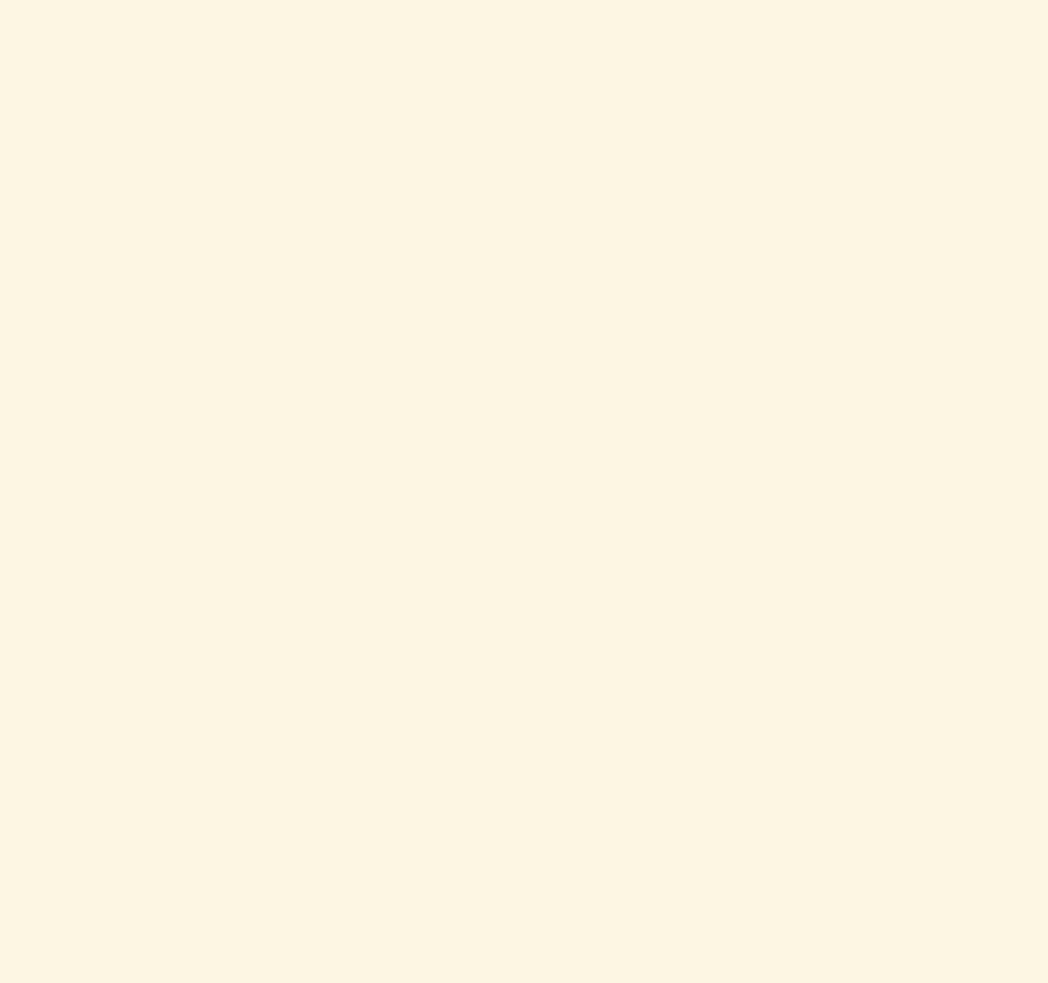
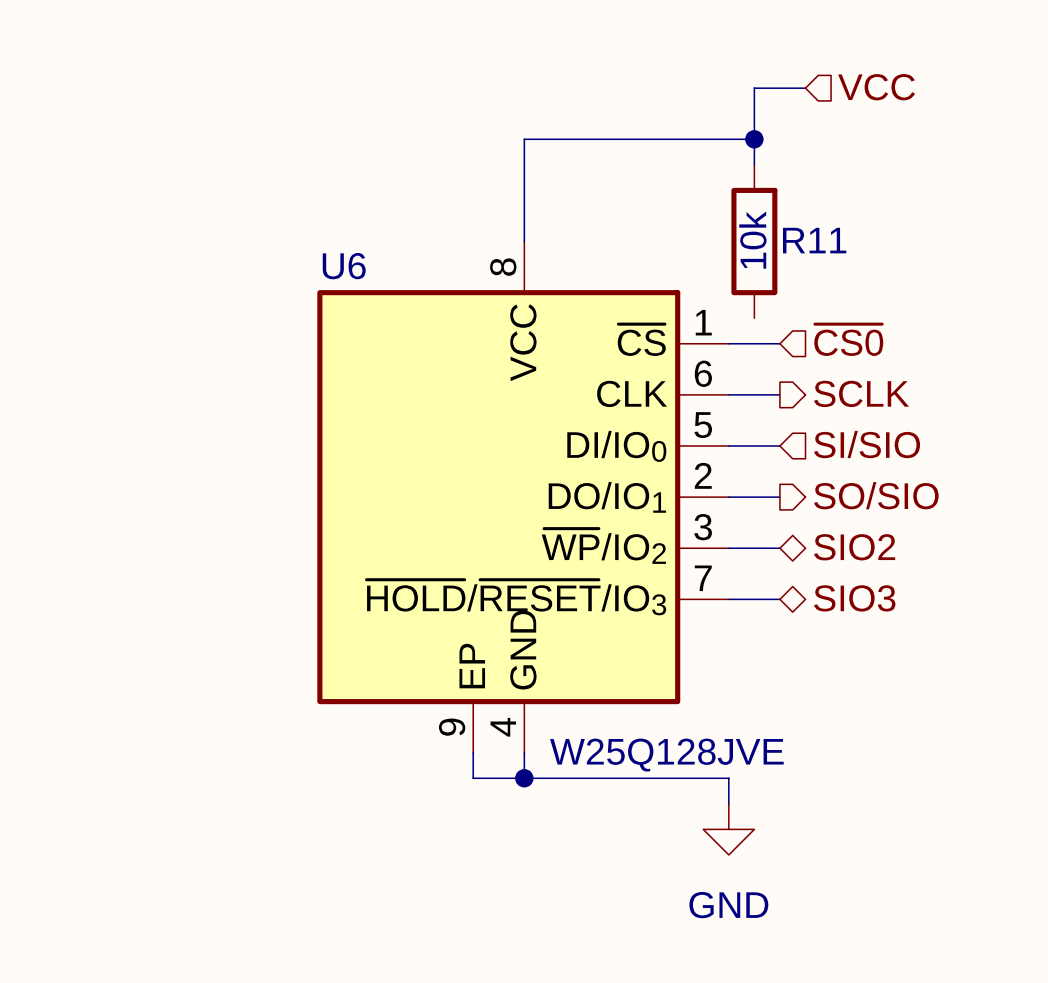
hierarchical label: none -> VCC (876, 87)
wire: none -> (805, 88) (754, 88) (754, 164)
wire: none -> (754, 139) (524, 139) (524, 241)
junction: none -> (754, 139)
R11: none -> 10k (754, 241)
hierarchical label: none -> ~{CS0} (848, 340)
wire: none -> (728, 343) (779, 343)
hierarchical label: none -> SCLK (861, 393)
wire: none -> (728, 394) (779, 394)
wire: none -> (728, 446) (779, 446)
hierarchical label: none -> SI/SIO (867, 444)
U6: none -> W25Q128JVE (523, 497)
wire: none -> (728, 497) (779, 497)
hierarchical label: none -> SO/SIO (876, 495)
hierarchical label: none -> SIO2 (854, 547)
wire: none -> (728, 548) (779, 548)
hierarchical label: none -> SIO3 (854, 598)
wire: none -> (728, 599) (779, 599)
wire: none -> (473, 752) (473, 778) (728, 778) (728, 803)
wire: none -> (524, 752) (524, 778)
junction: none -> (524, 778)
power symbol: none -> GND (728, 829)

